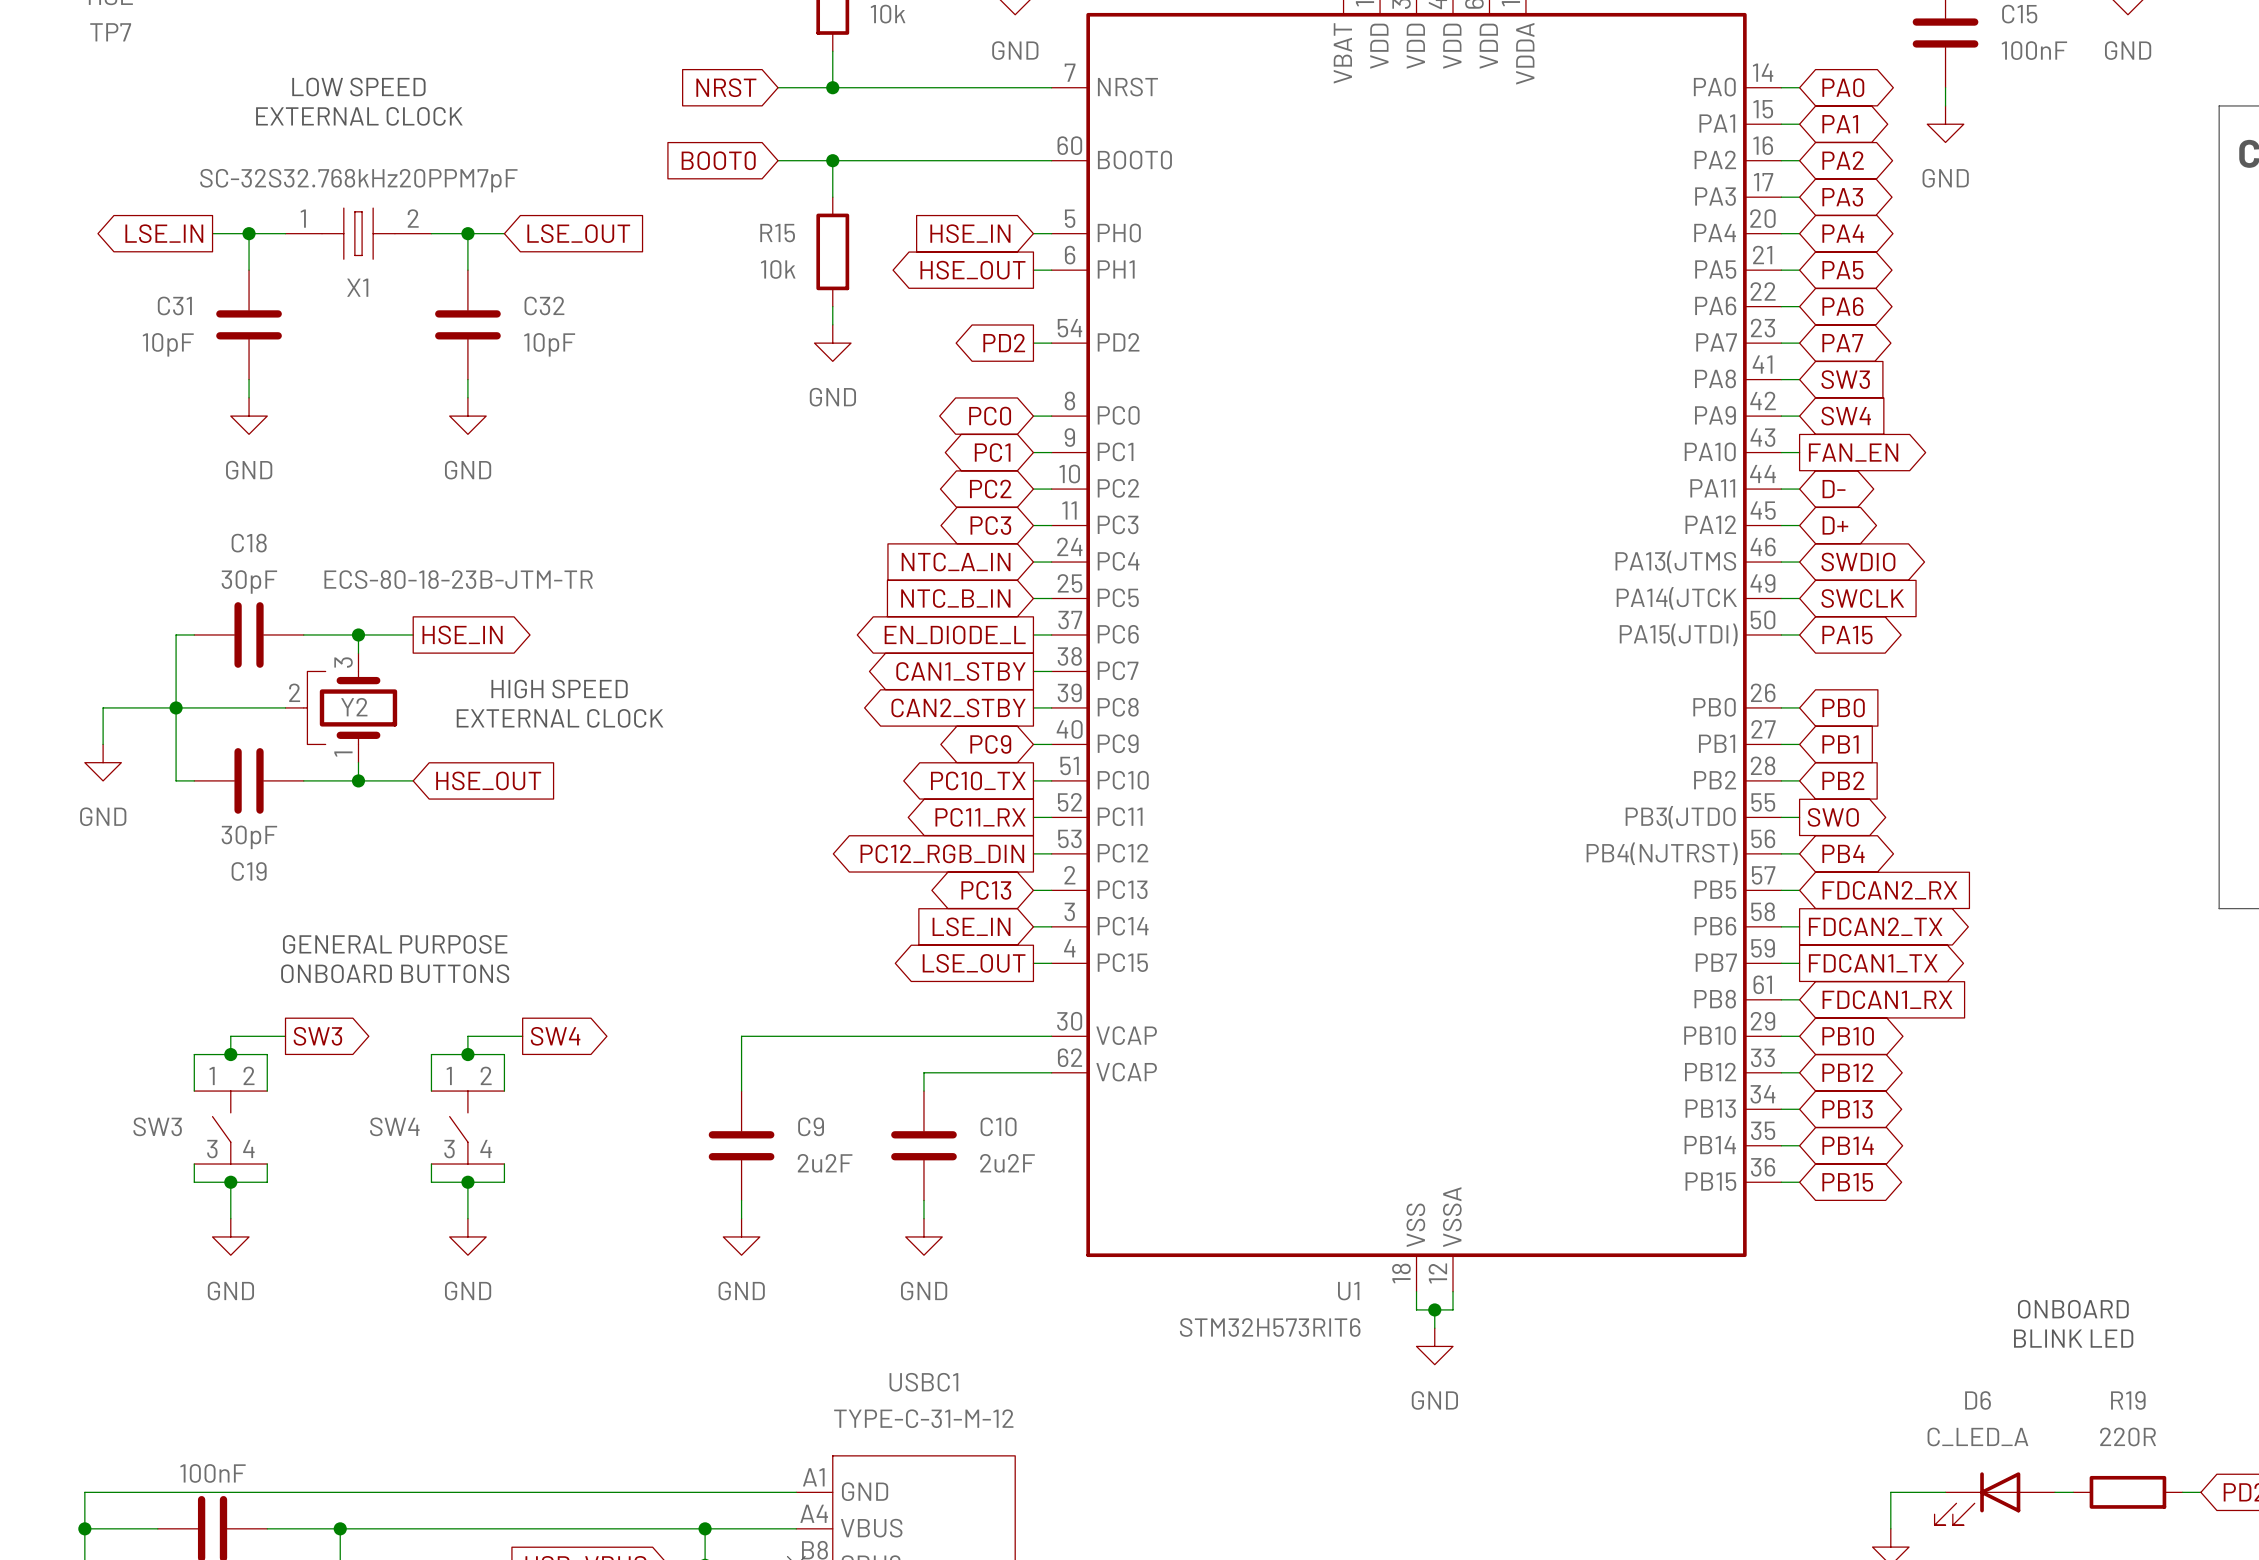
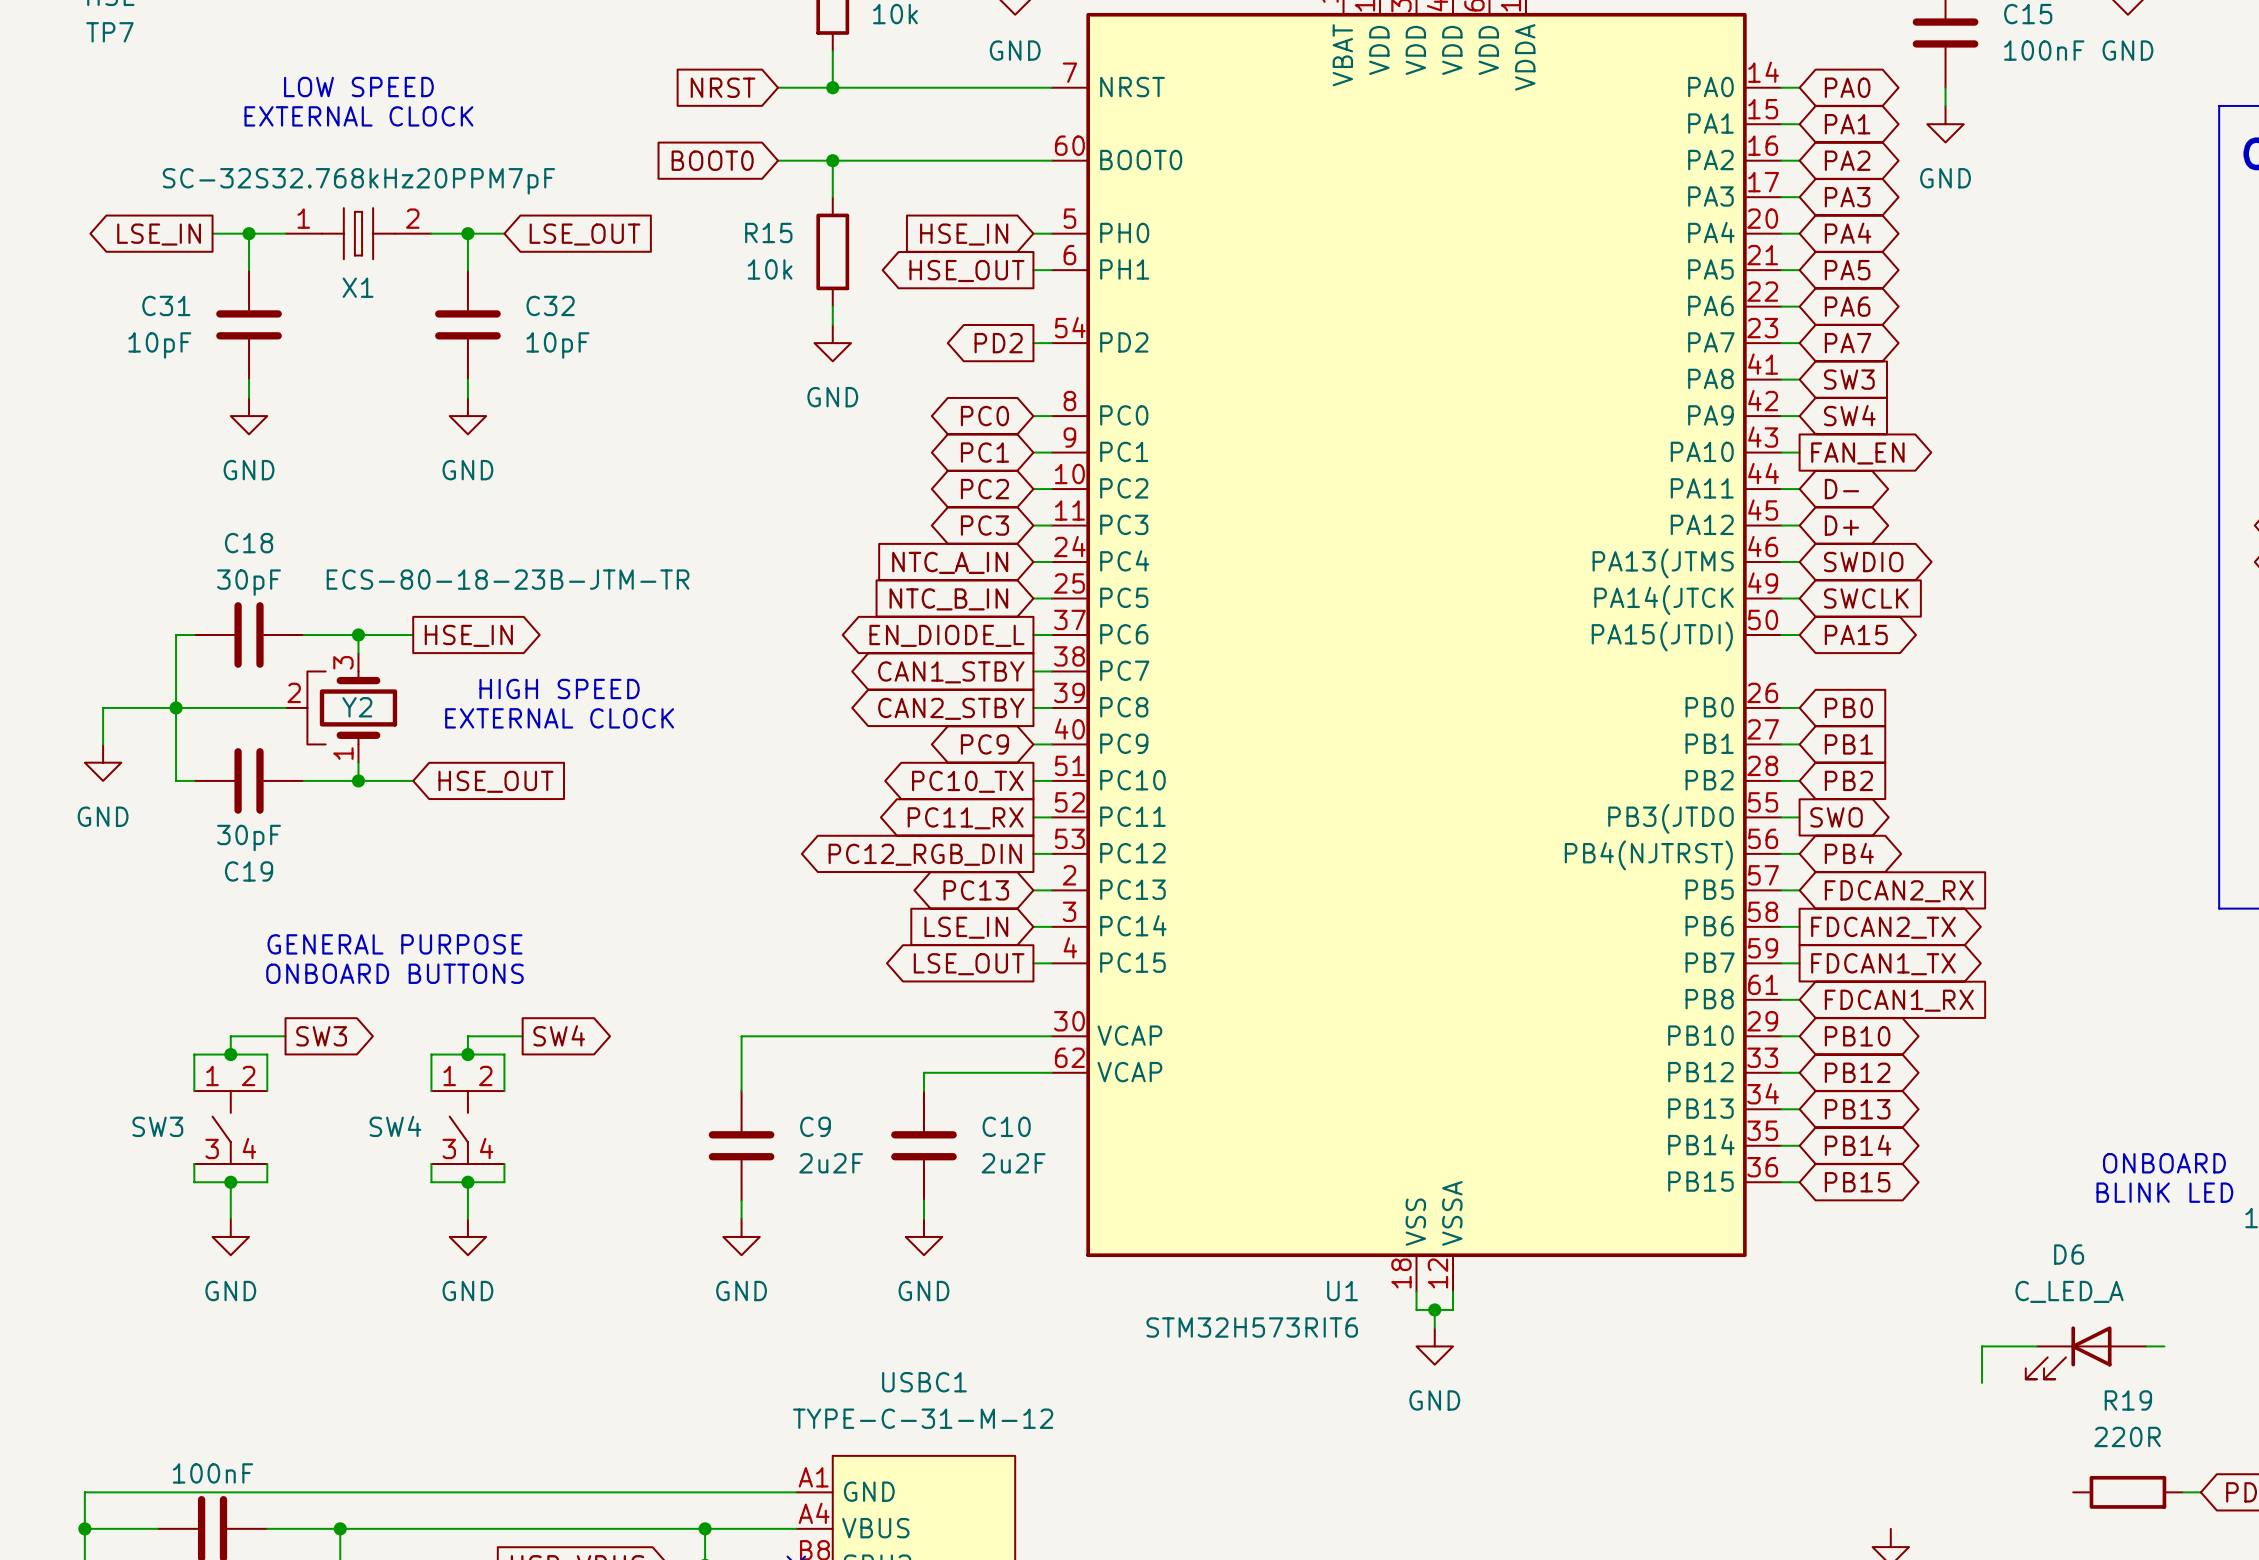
text position: ONBOARD (2073, 1309) -> ONBOARD (2164, 1163)
text position: BLINK LED (2073, 1338) -> BLINK LED (2164, 1192)
wire: (1945, 1492) (1890, 1492) (1890, 1528) -> (2036, 1346) (1982, 1346) (1982, 1382)
wire: (2054, 1492) (2073, 1492) -> (2146, 1346) (2164, 1346)
D6 position: (1994, 1498) -> (2085, 1352)

